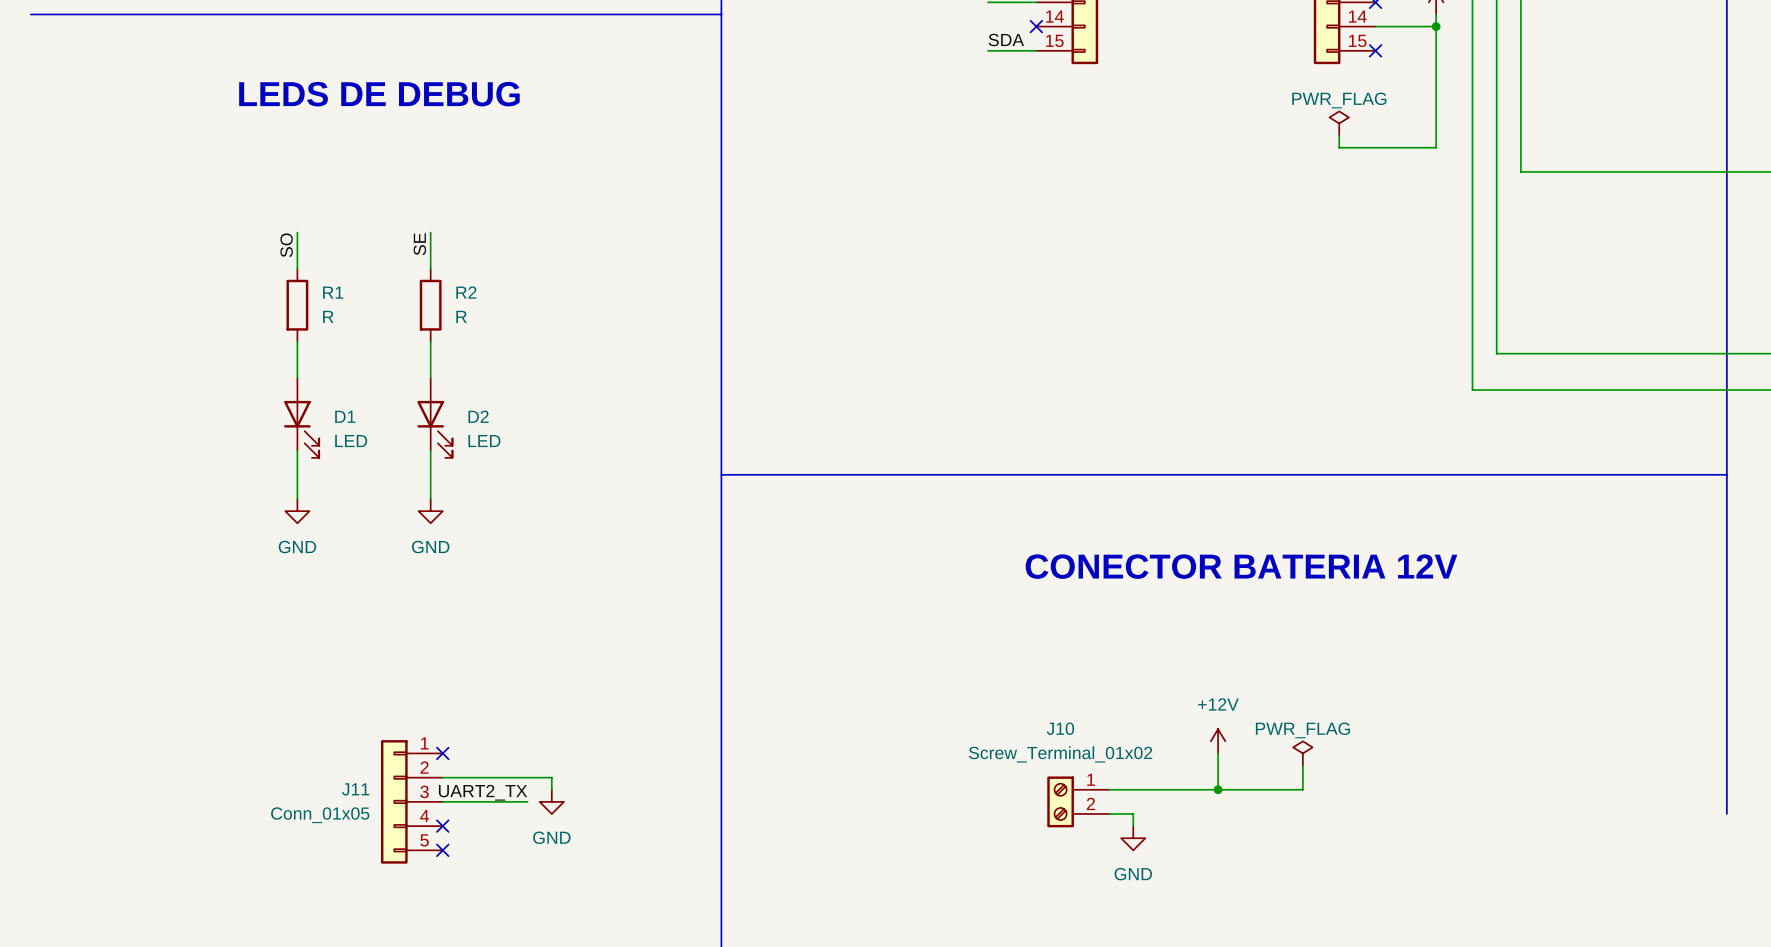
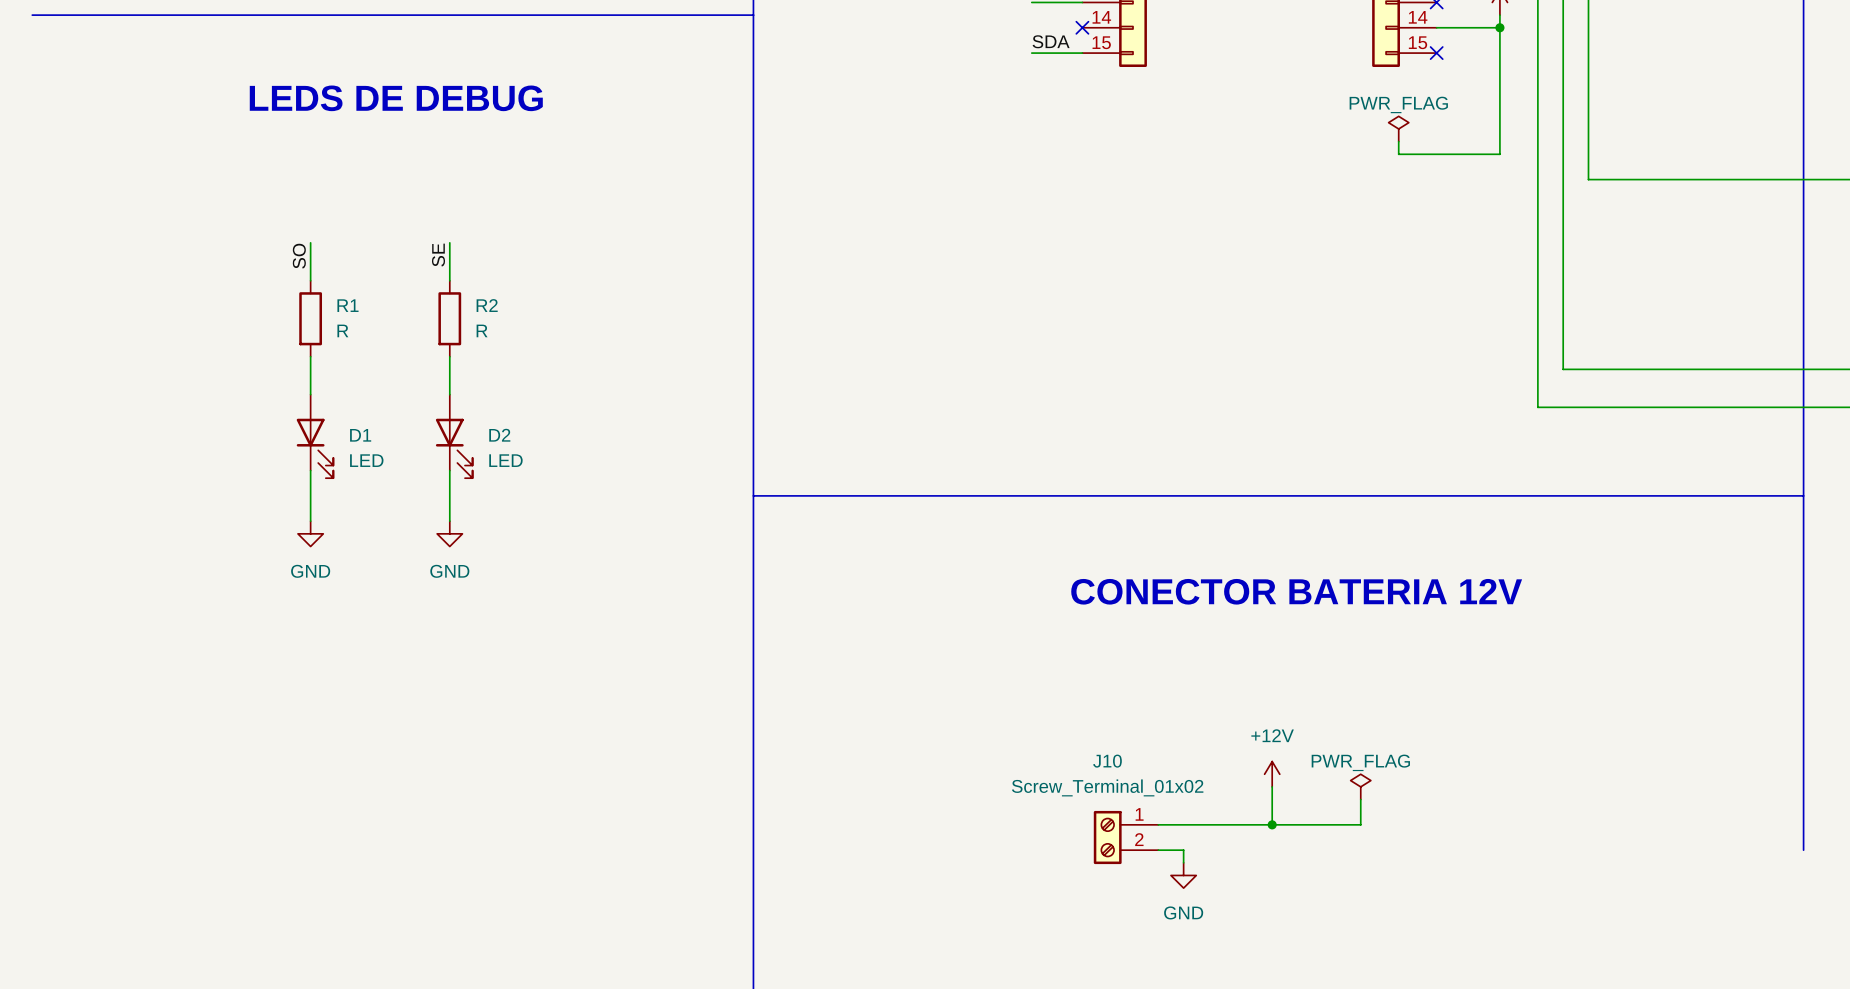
no-connect mark: (442, 753) -> none
wire: (442, 777) (551, 777) (551, 789) -> none
label: UART2_TX (483, 792) -> none
J11: Conn_01x05 (411, 801) -> none
wire: (442, 801) (527, 801) -> none
power symbol: GND (551, 801) -> none
no-connect mark: (442, 826) -> none
no-connect mark: (442, 850) -> none

